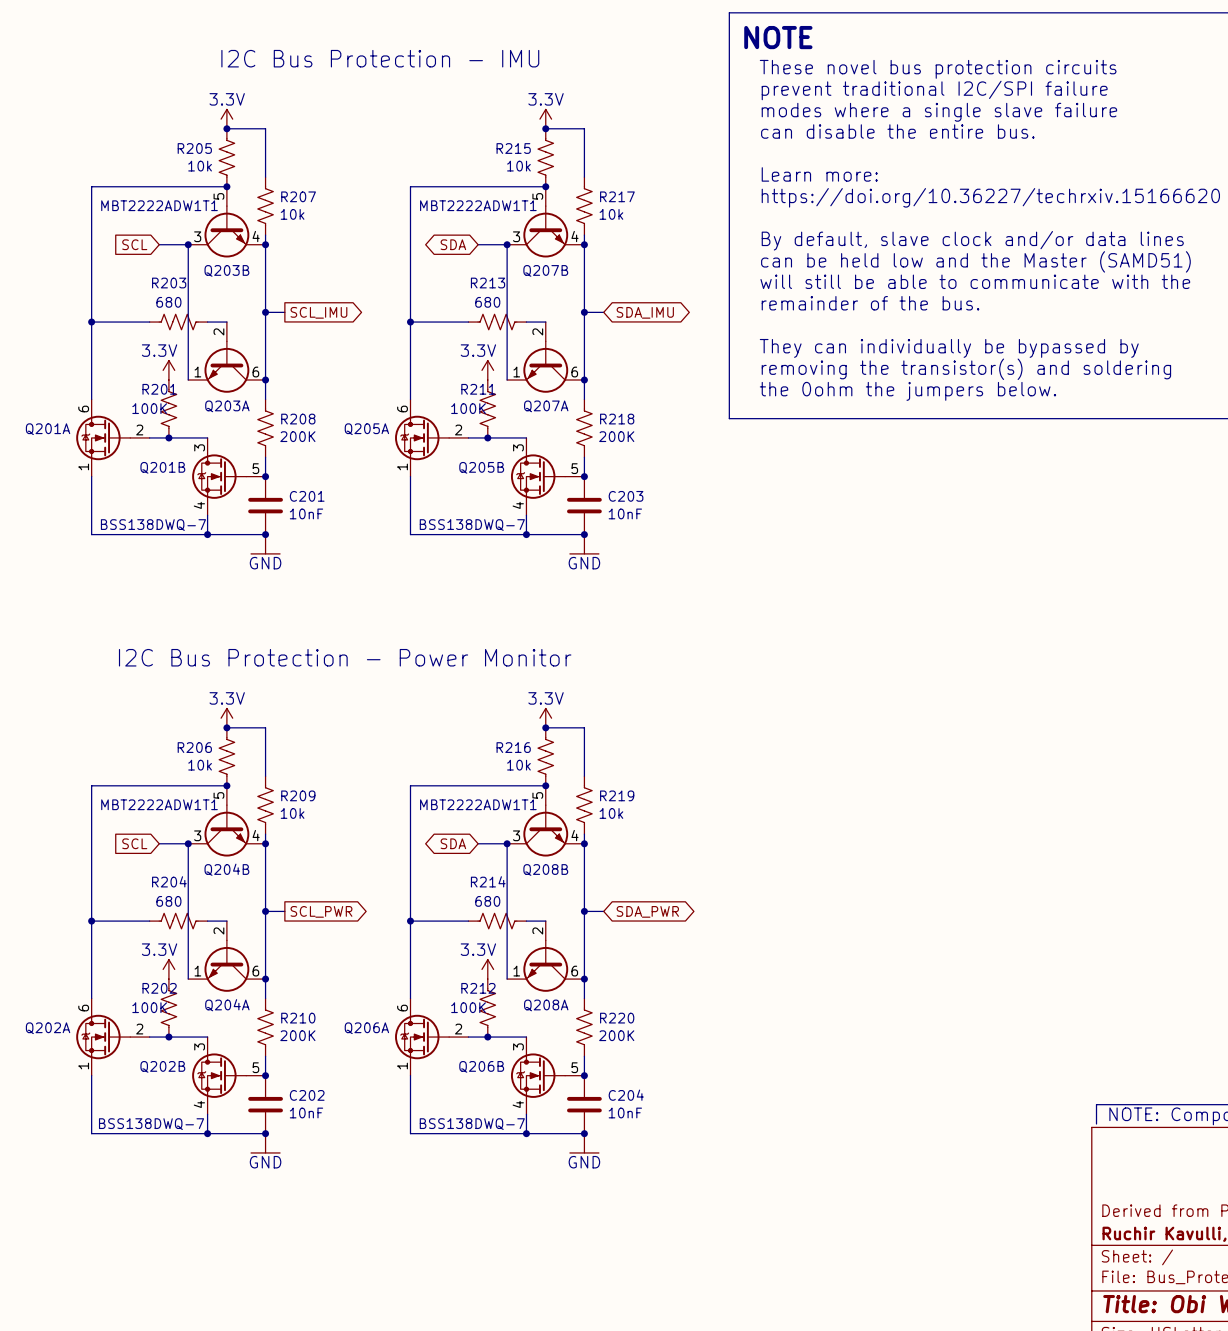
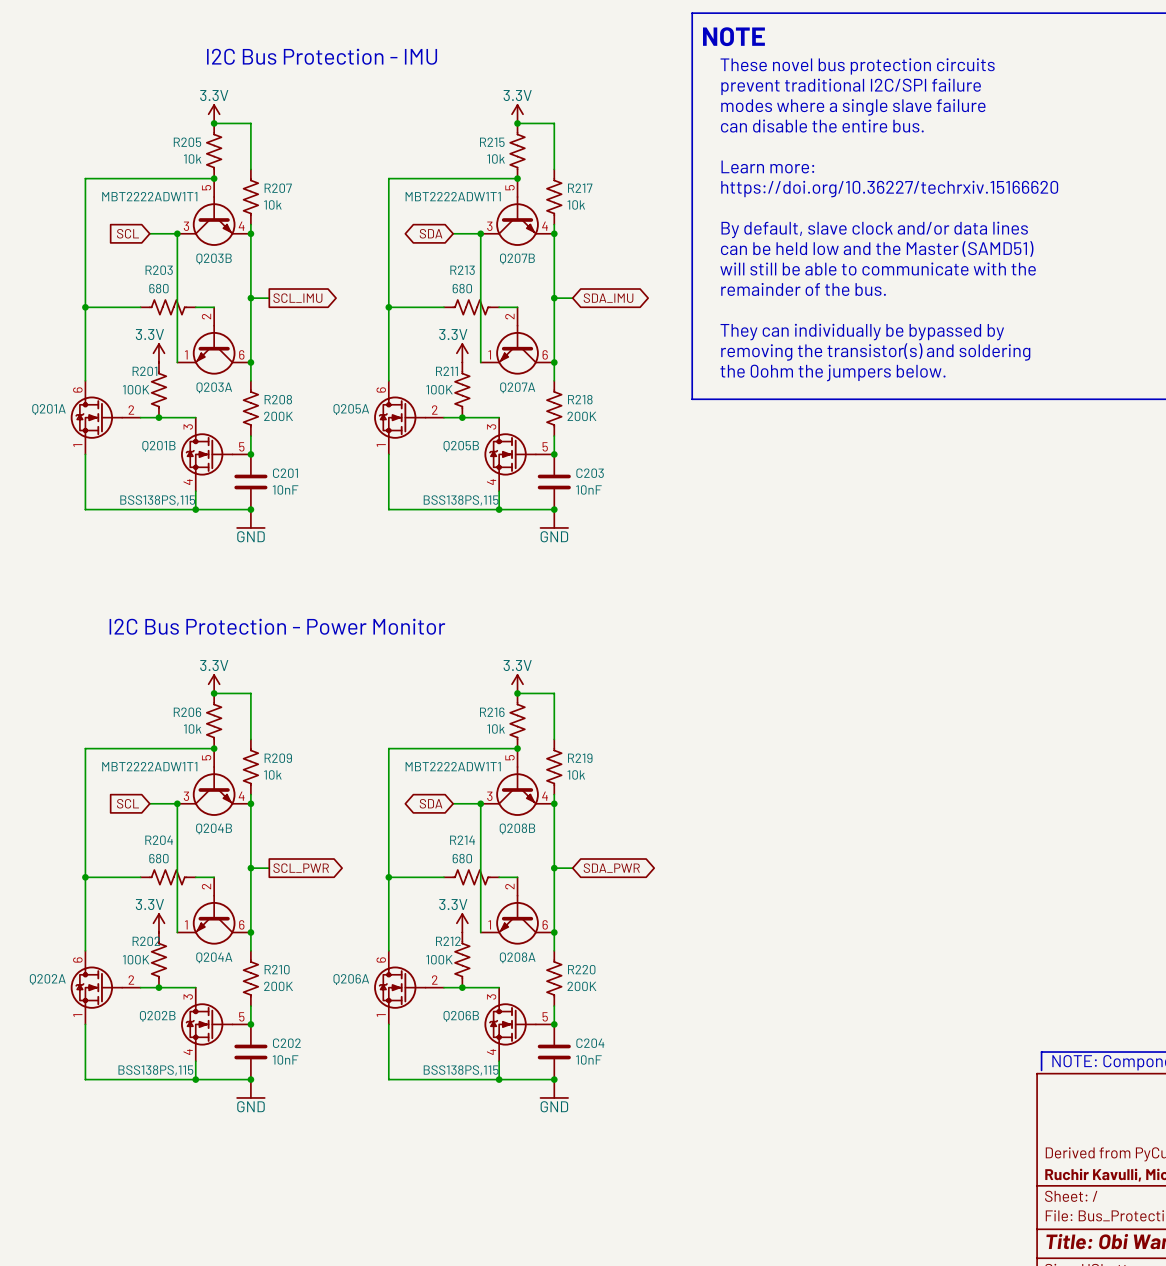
Q201A value: BSS138DWQ-7 (153, 525) -> BSS138PS,115 (157, 500)
Q205A value: BSS138DWQ-7 (472, 525) -> BSS138PS,115 (461, 500)
Q202A value: BSS138DWQ-7 (151, 1124) -> BSS138PS,115 (155, 1070)
Q206A value: BSS138DWQ-7 (472, 1124) -> BSS138PS,115 (461, 1070)

